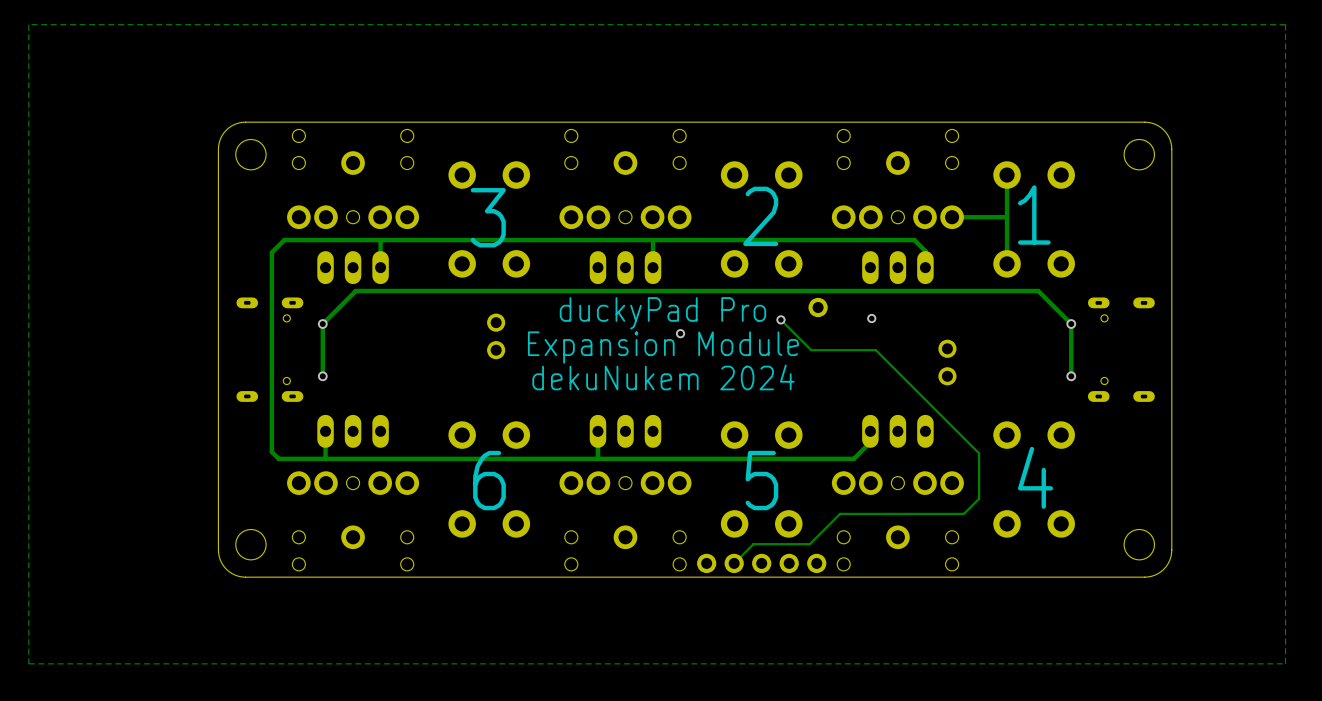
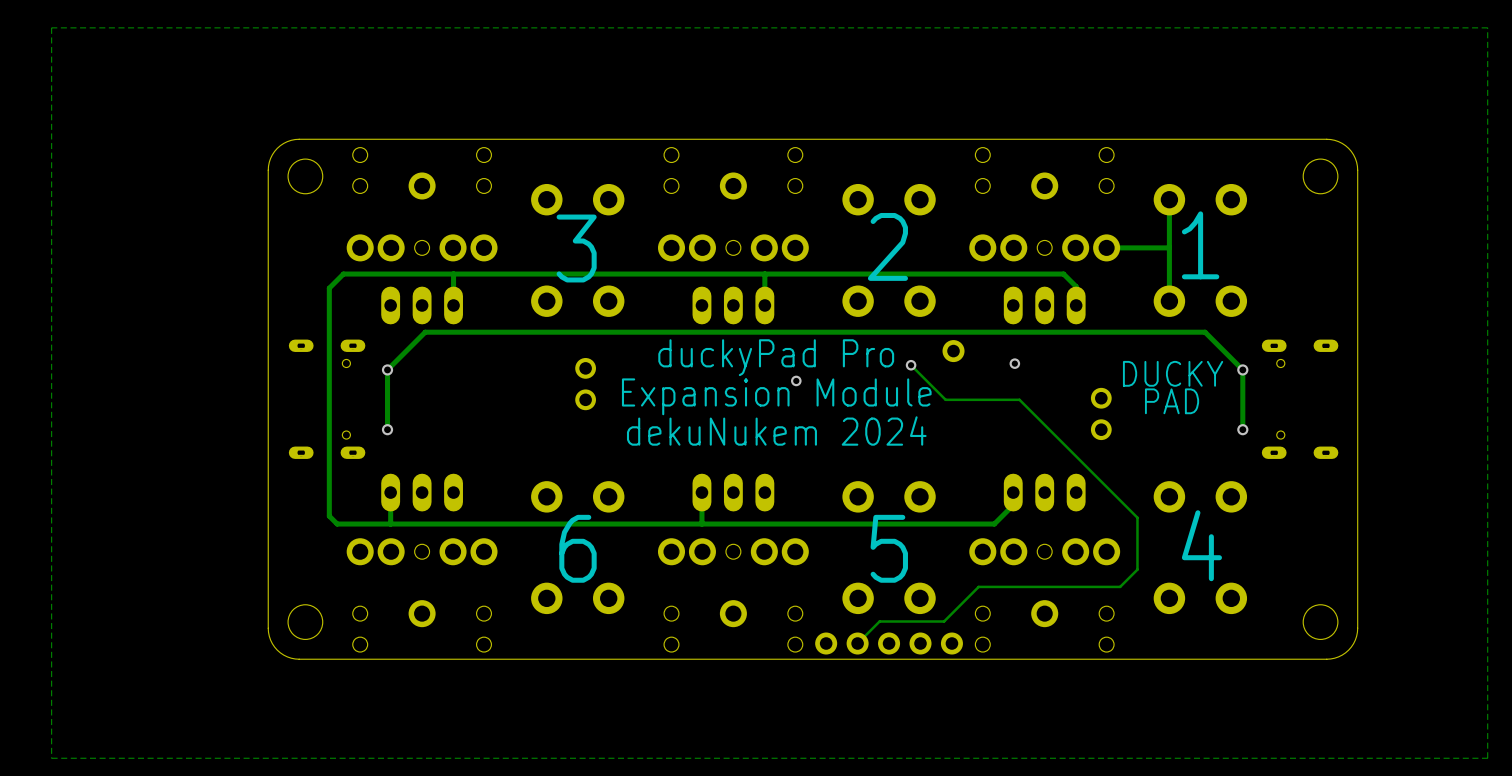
text: none -> DUCKY (1173, 373)
text: none -> PAD (1172, 401)

